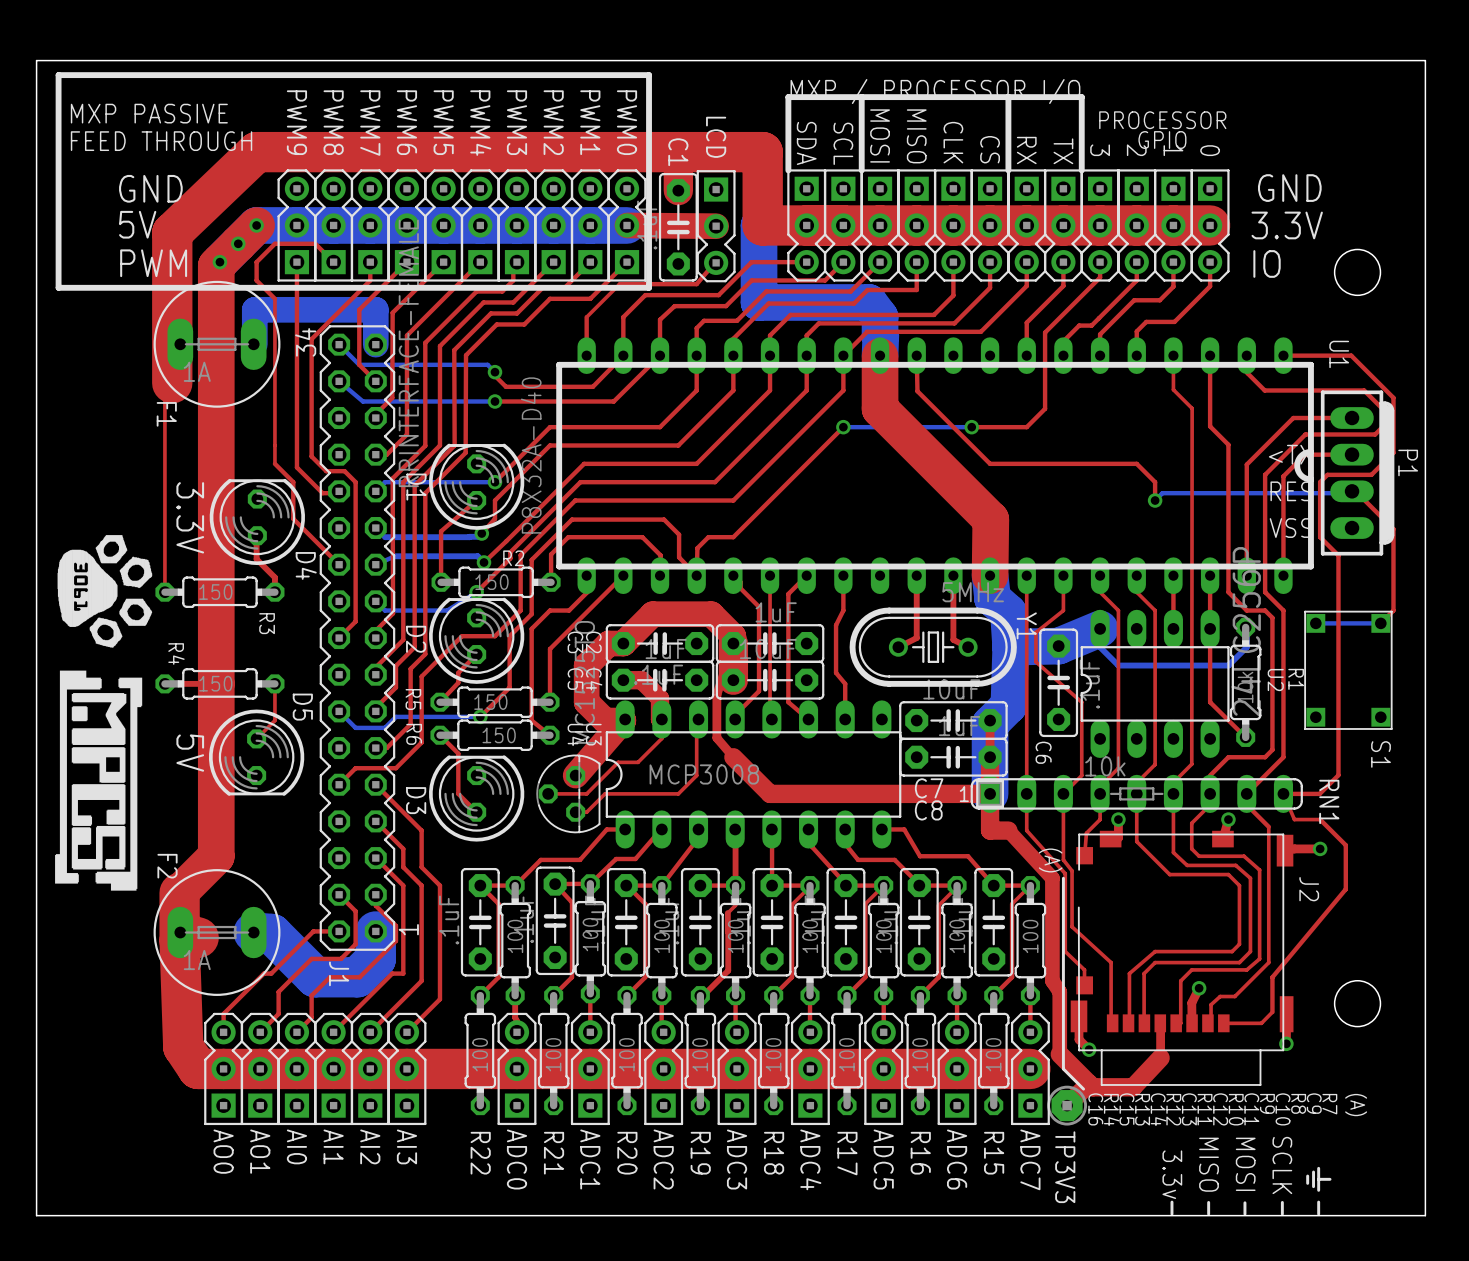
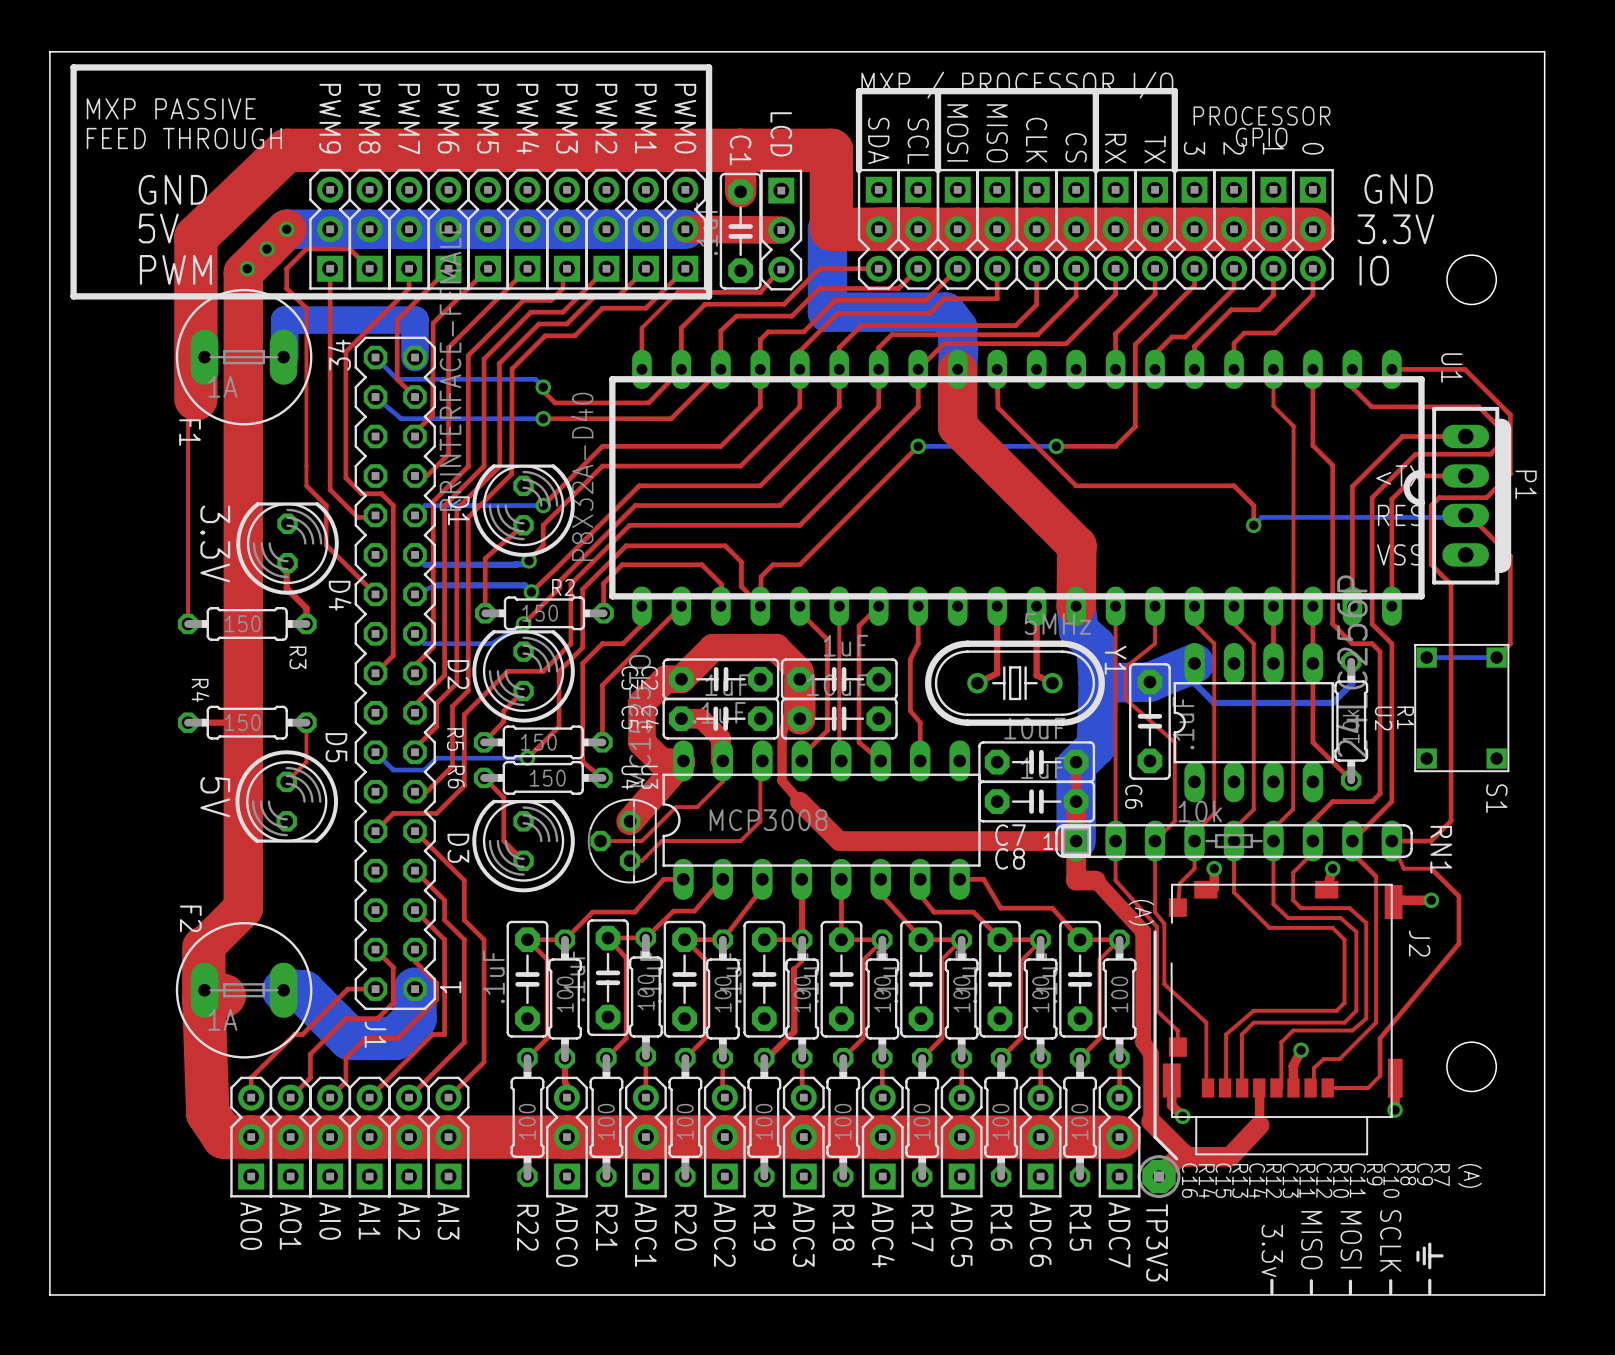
drawing: [57, 535, 153, 648] -> none
drawing: [55, 670, 143, 891] -> none

